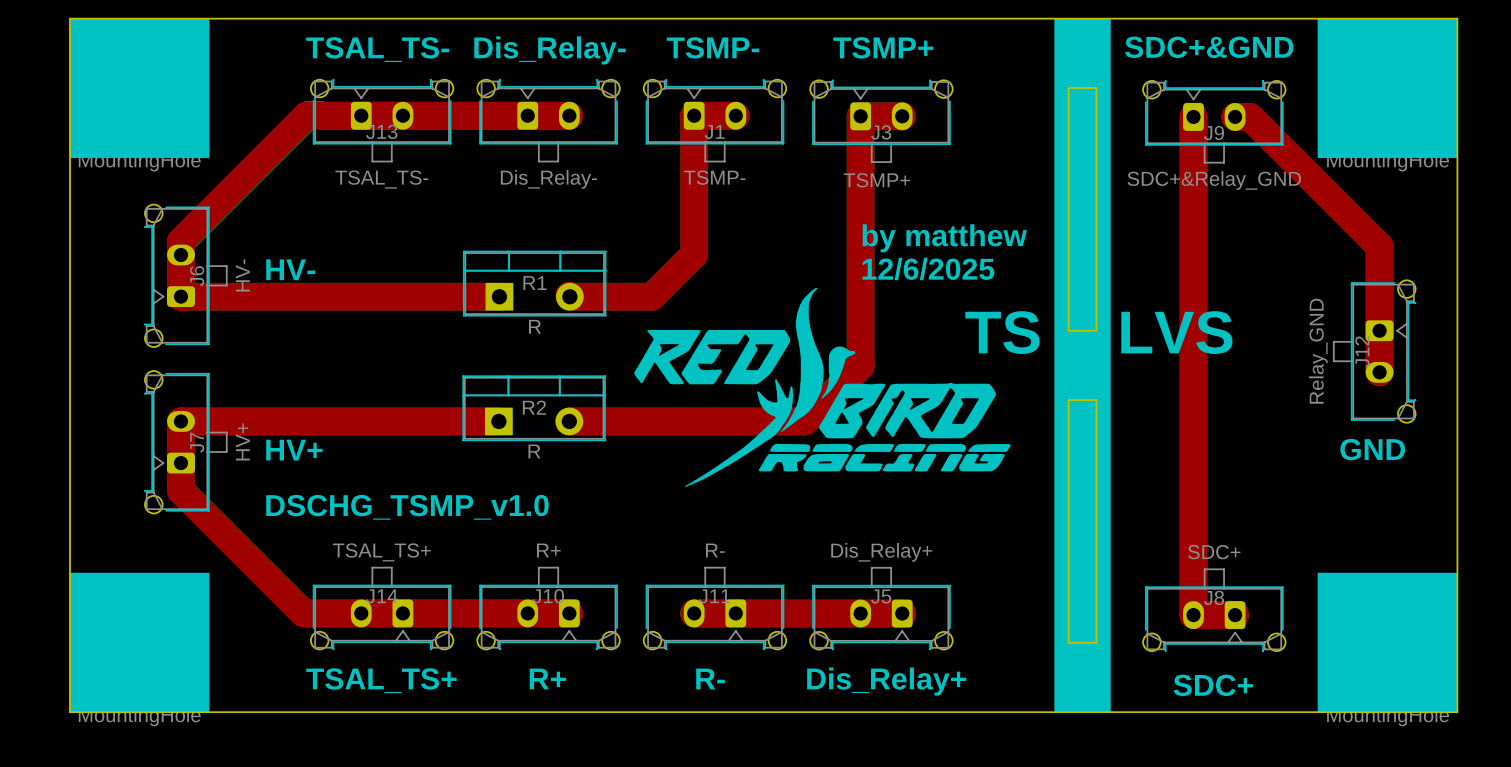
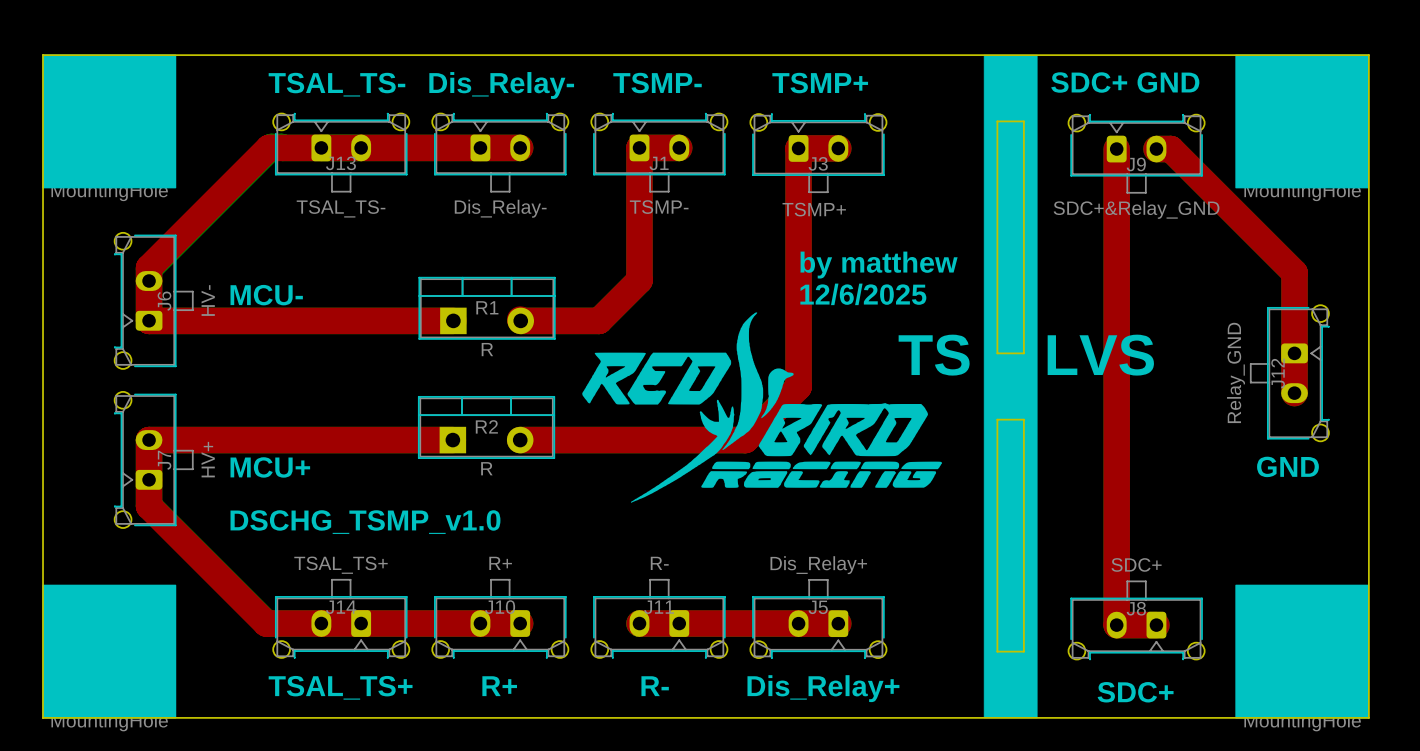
text: SDC+&GND (1209, 47) -> SDC+ GND (1125, 82)
text: HV- (290, 269) -> MCU- (266, 295)
text: HV+ (294, 450) -> MCU+ (270, 467)

